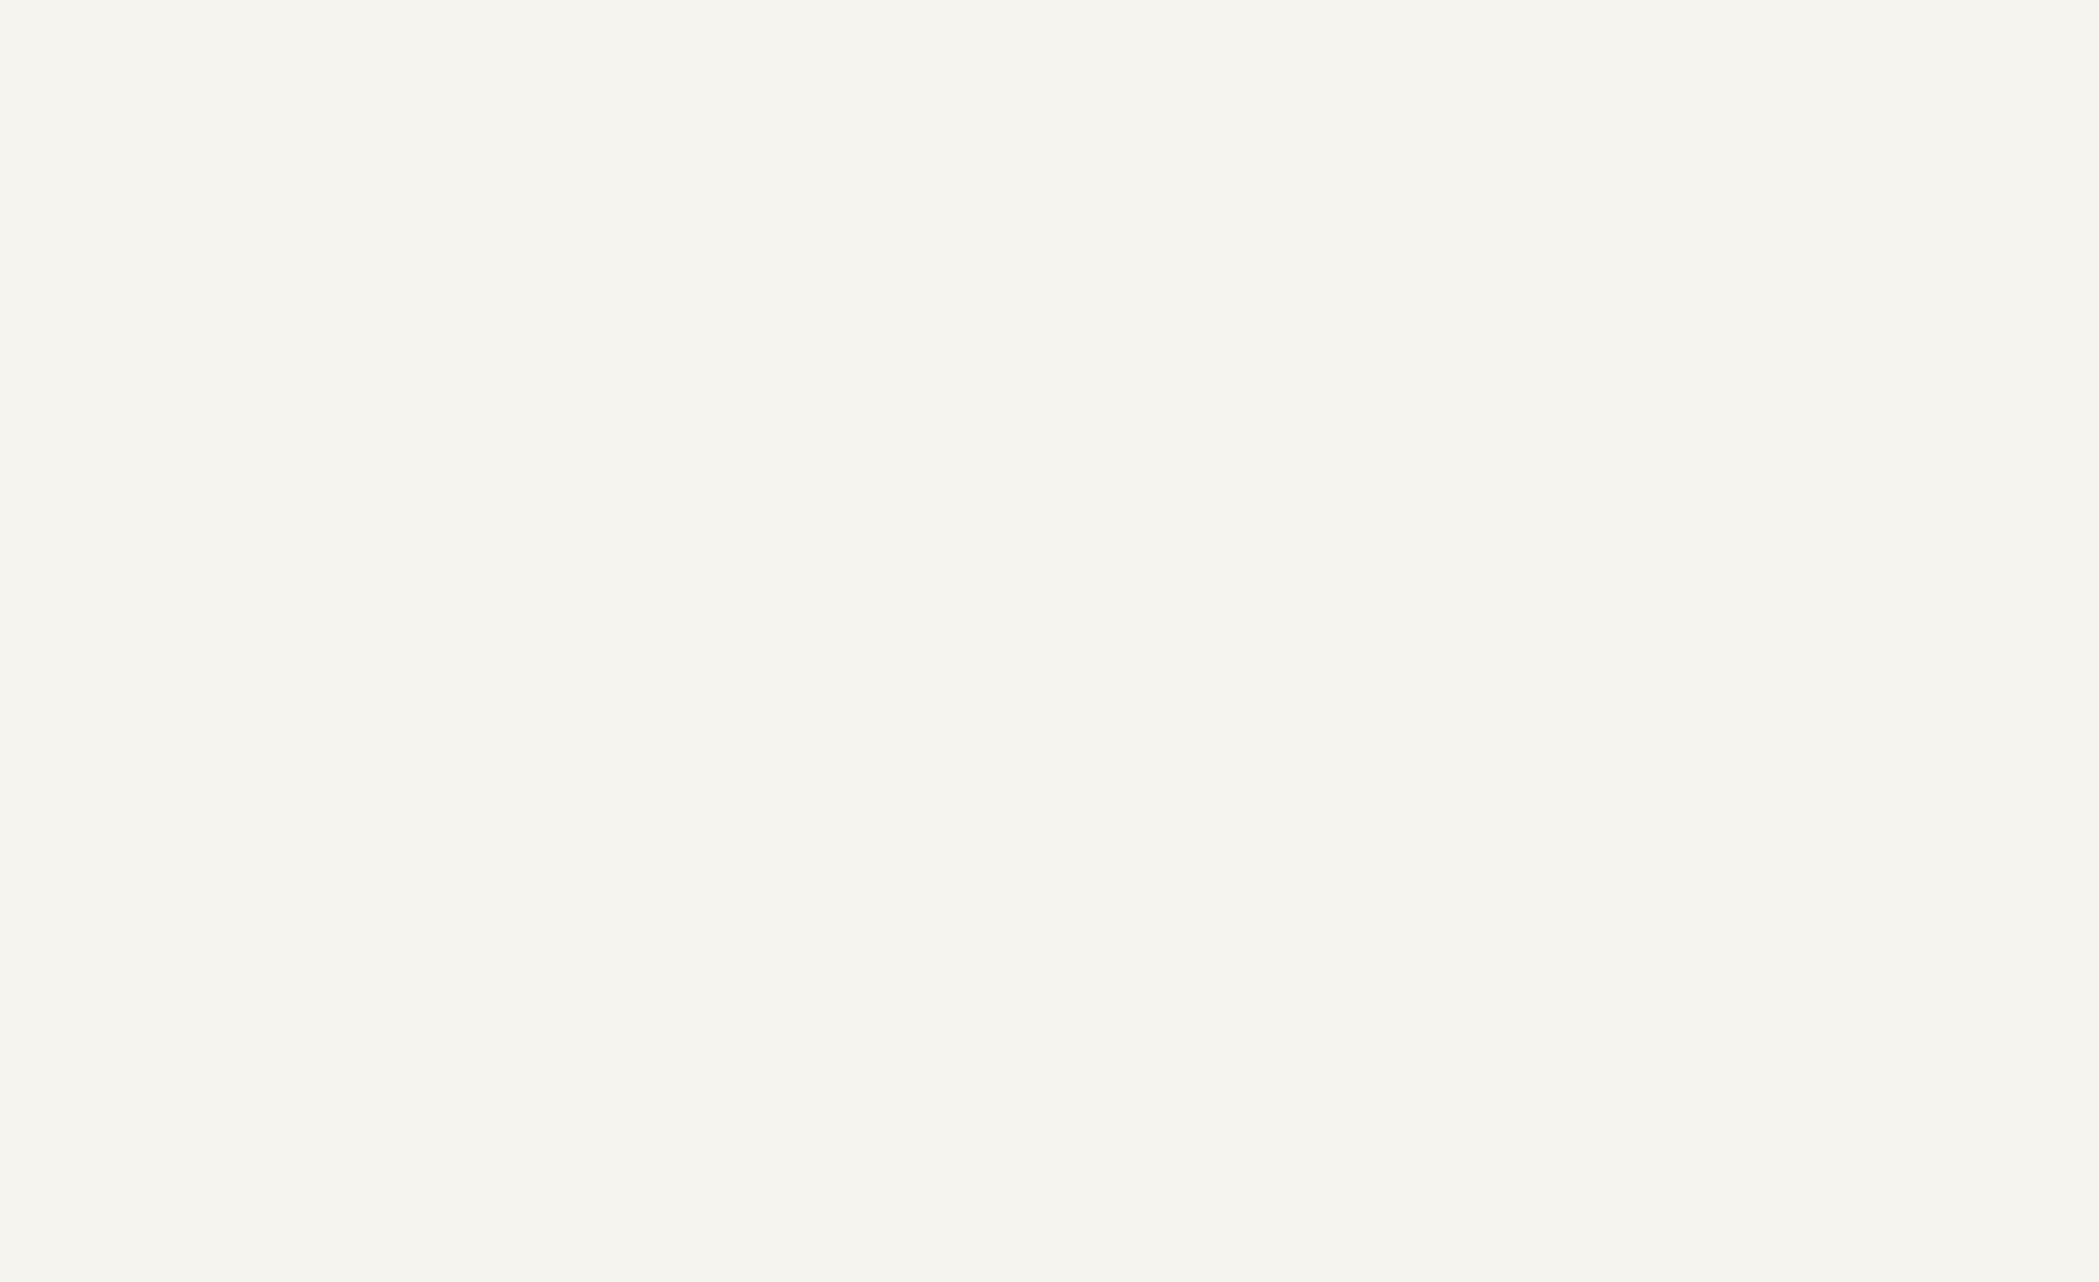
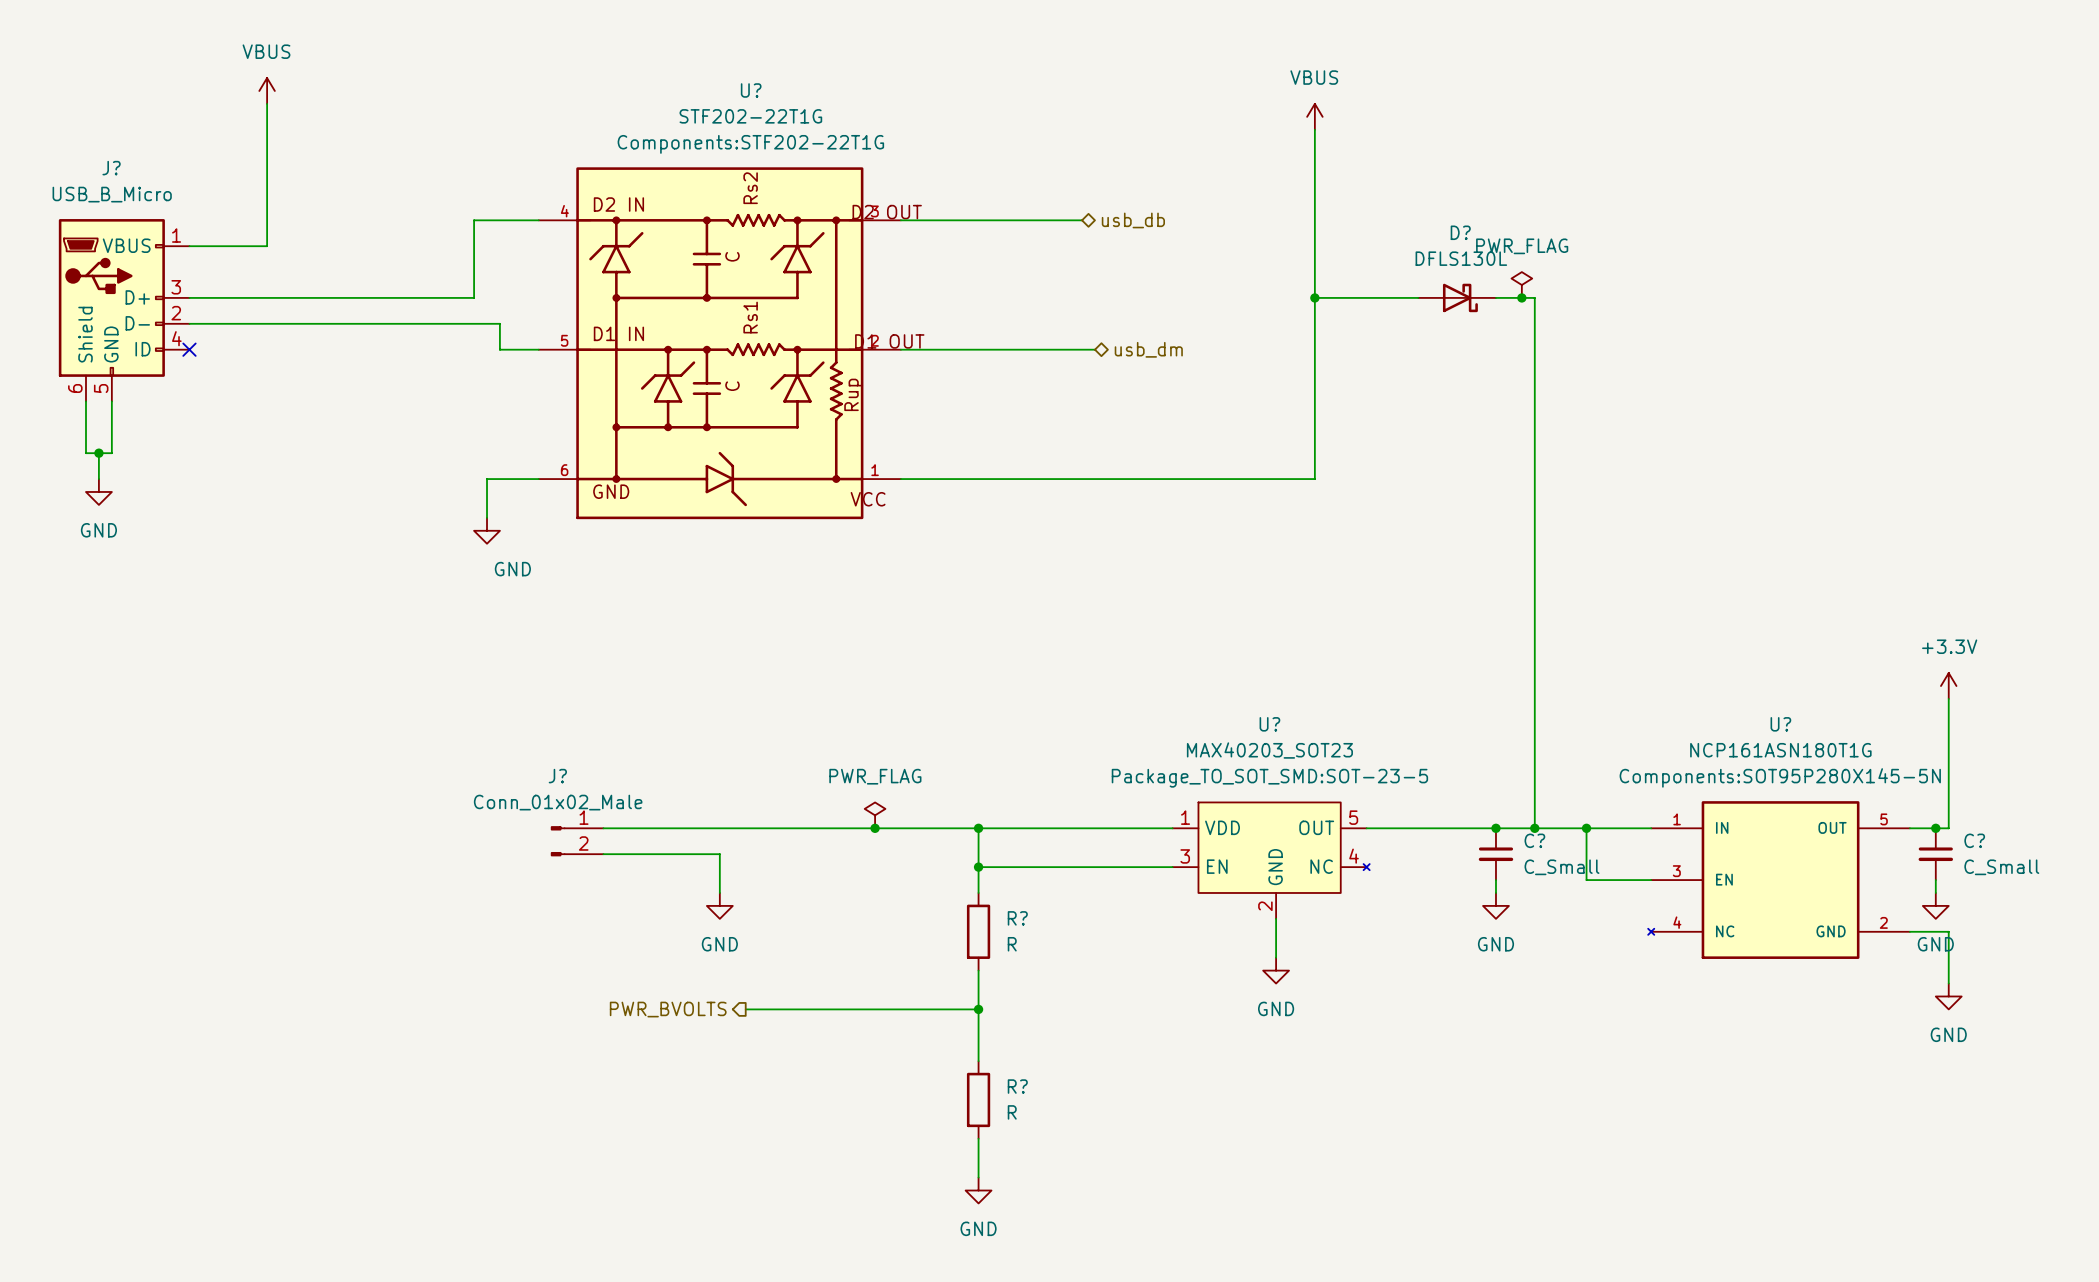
power symbol: none -> VBUS (267, 90)
wire: none -> (267, 103) (267, 246) (189, 246)
power symbol: none -> VBUS (1314, 116)
wire: none -> (1314, 129) (1314, 479) (900, 479)
wire: none -> (538, 220) (474, 220) (474, 297) (189, 297)
wire: none -> (900, 220) (1082, 220)
hierarchical label: none -> usb_db (1133, 220)
power symbol: none -> PWR_FLAG (1521, 285)
wire: none -> (1314, 297) (1418, 297)
junction: none -> (1314, 297)
D?: none -> DFLS130L (1457, 297)
wire: none -> (1495, 297) (1534, 297) (1534, 828)
junction: none -> (1521, 297)
J?: none -> USB_B_Micro (124, 310)
wire: none -> (189, 323) (499, 323) (499, 349) (538, 349)
U?: none -> STF202-22T1G (719, 343)
no-connect mark: none -> (189, 349)
wire: none -> (900, 349) (1094, 349)
hierarchical label: none -> usb_dm (1148, 349)
wire: none -> (85, 401) (85, 453) (111, 453) (111, 401)
wire: none -> (98, 453) (98, 479)
junction: none -> (98, 453)
wire: none -> (538, 479) (487, 479) (487, 517)
power symbol: none -> GND (98, 491)
power symbol: none -> GND (487, 530)
power symbol: none -> +3.3V (1948, 686)
wire: none -> (1948, 698) (1948, 828) (1909, 828)
power symbol: none -> PWR_FLAG (875, 815)
wire: none -> (603, 828) (1172, 828)
junction: none -> (875, 828)
wire: none -> (978, 828) (978, 892)
junction: none -> (978, 828)
wire: none -> (1366, 828) (1651, 828)
junction: none -> (1495, 828)
junction: none -> (1534, 828)
wire: none -> (1586, 828) (1586, 880) (1651, 880)
junction: none -> (1586, 828)
junction: none -> (1935, 828)
J?: none -> Conn_01x02_Male (577, 841)
wire: none -> (603, 854) (719, 854) (719, 892)
C?: none -> C_Small (1495, 854)
C?: none -> C_Small (1935, 854)
U?: none -> MAX40203_SOT23 (1271, 860)
wire: none -> (978, 867) (1172, 867)
junction: none -> (978, 867)
wire: none -> (1495, 880) (1495, 892)
U?: none -> NCP161ASN180T1G (1779, 880)
wire: none -> (1935, 880) (1935, 892)
power symbol: none -> GND (719, 905)
power symbol: none -> GND (1495, 905)
power symbol: none -> GND (1935, 905)
wire: none -> (1276, 918) (1276, 957)
R?: none -> R (978, 931)
wire: none -> (1909, 931) (1948, 931) (1948, 983)
wire: none -> (978, 970) (978, 1061)
power symbol: none -> GND (1276, 970)
power symbol: none -> GND (1948, 996)
hierarchical label: none -> PWR_BVOLTS (668, 1009)
wire: none -> (745, 1009) (978, 1009)
junction: none -> (978, 1009)
R?: none -> R (978, 1099)
wire: none -> (978, 1138) (978, 1177)
power symbol: none -> GND (978, 1190)

